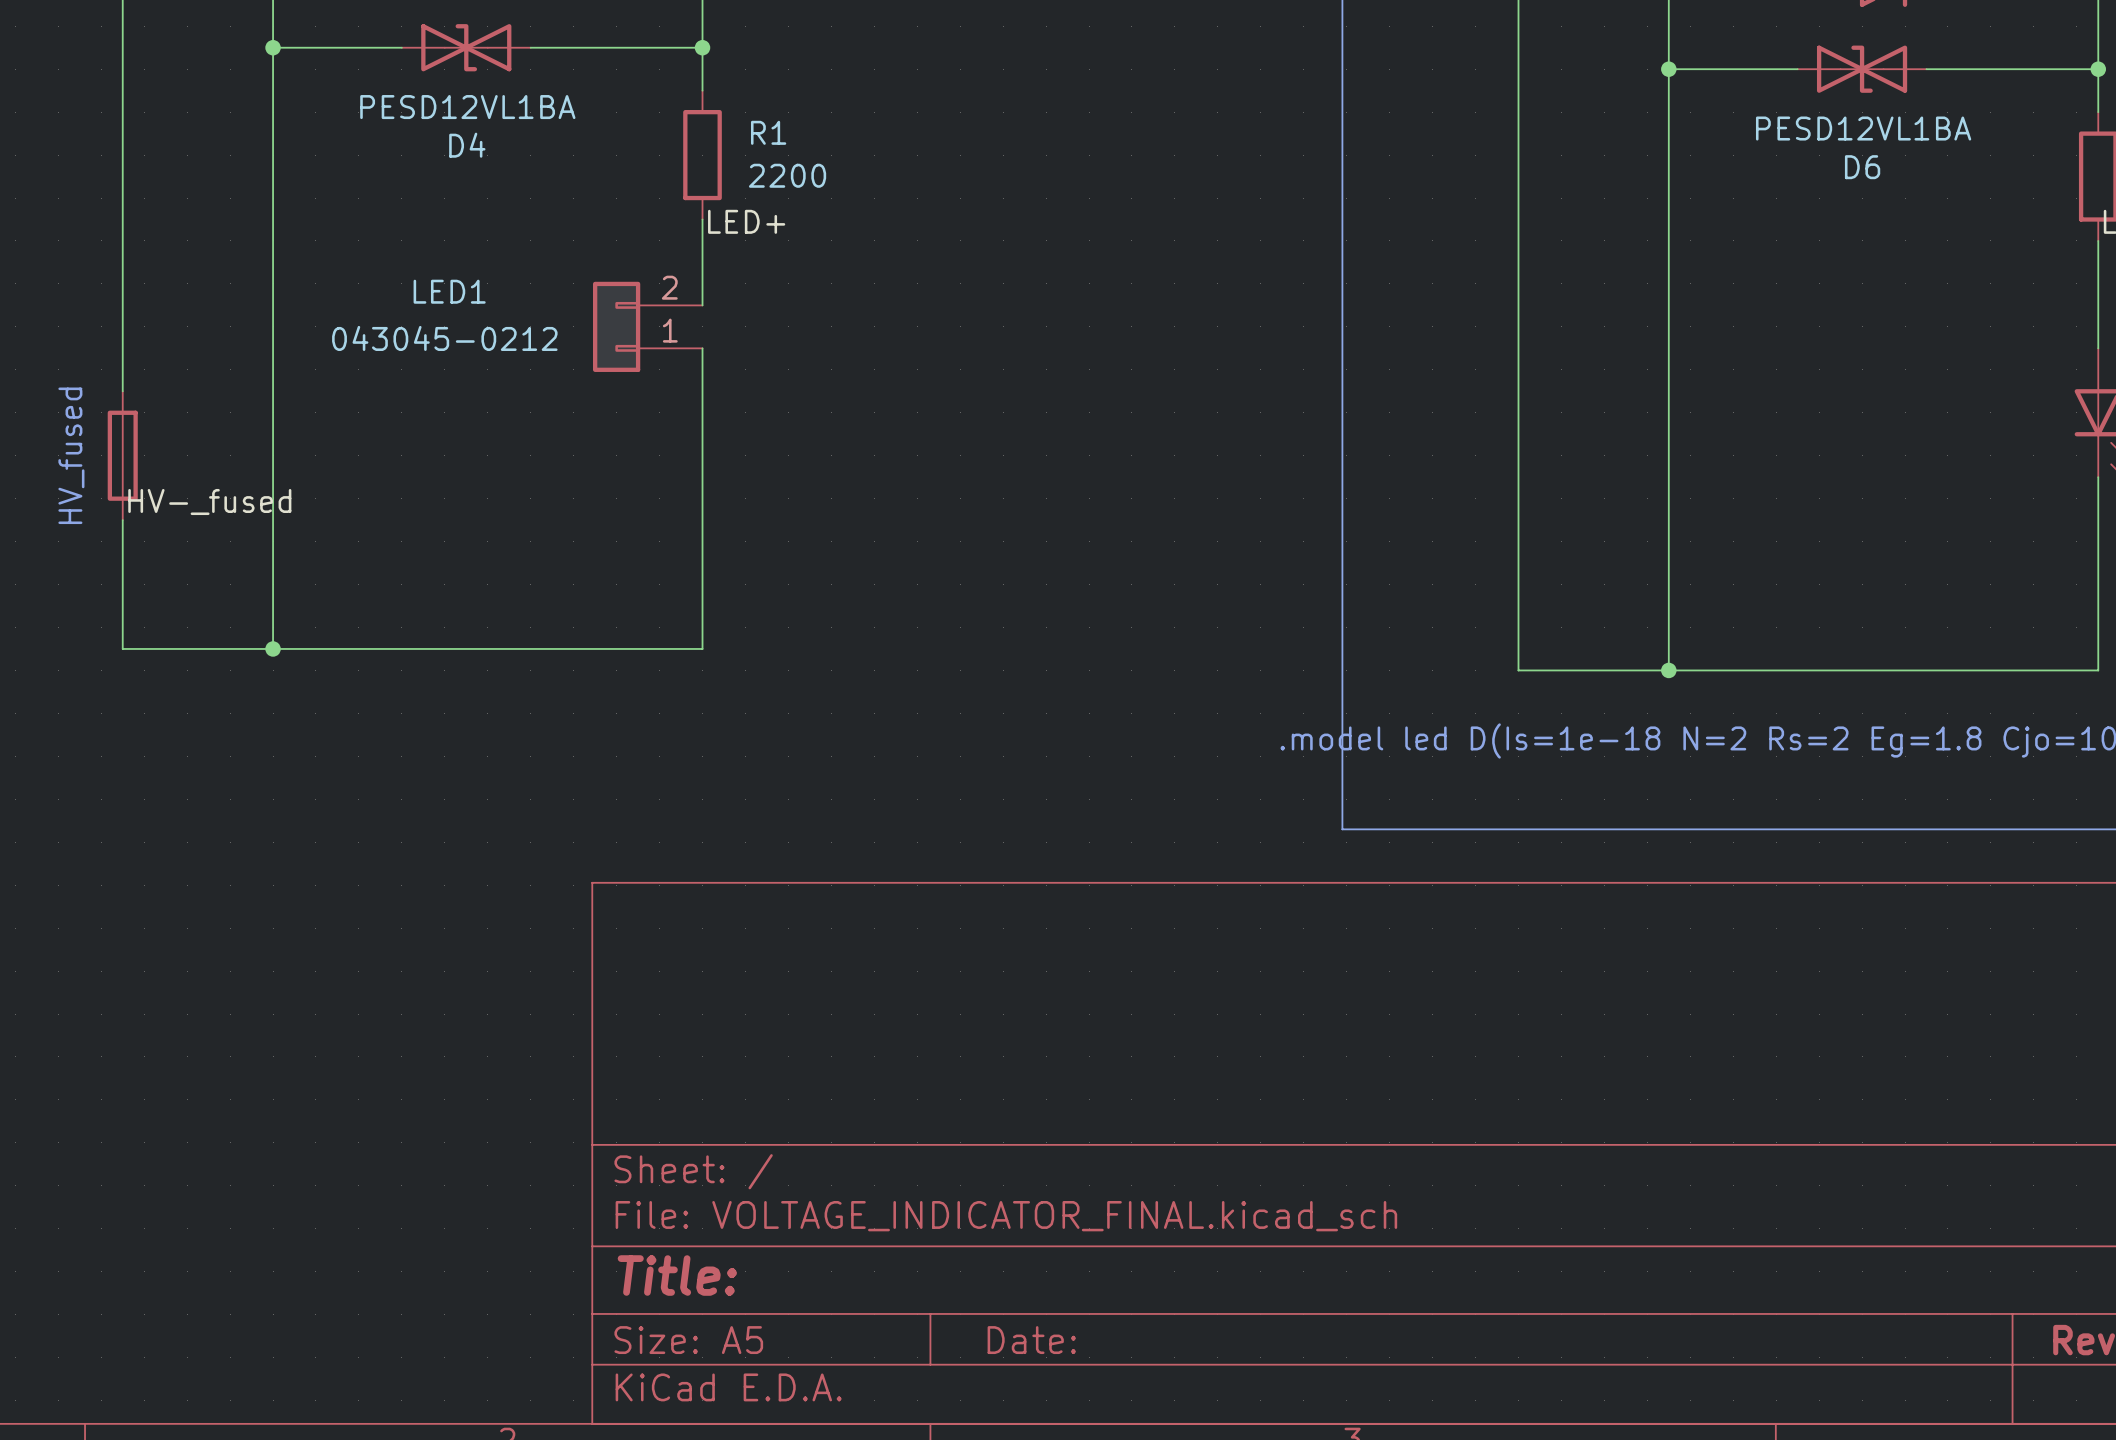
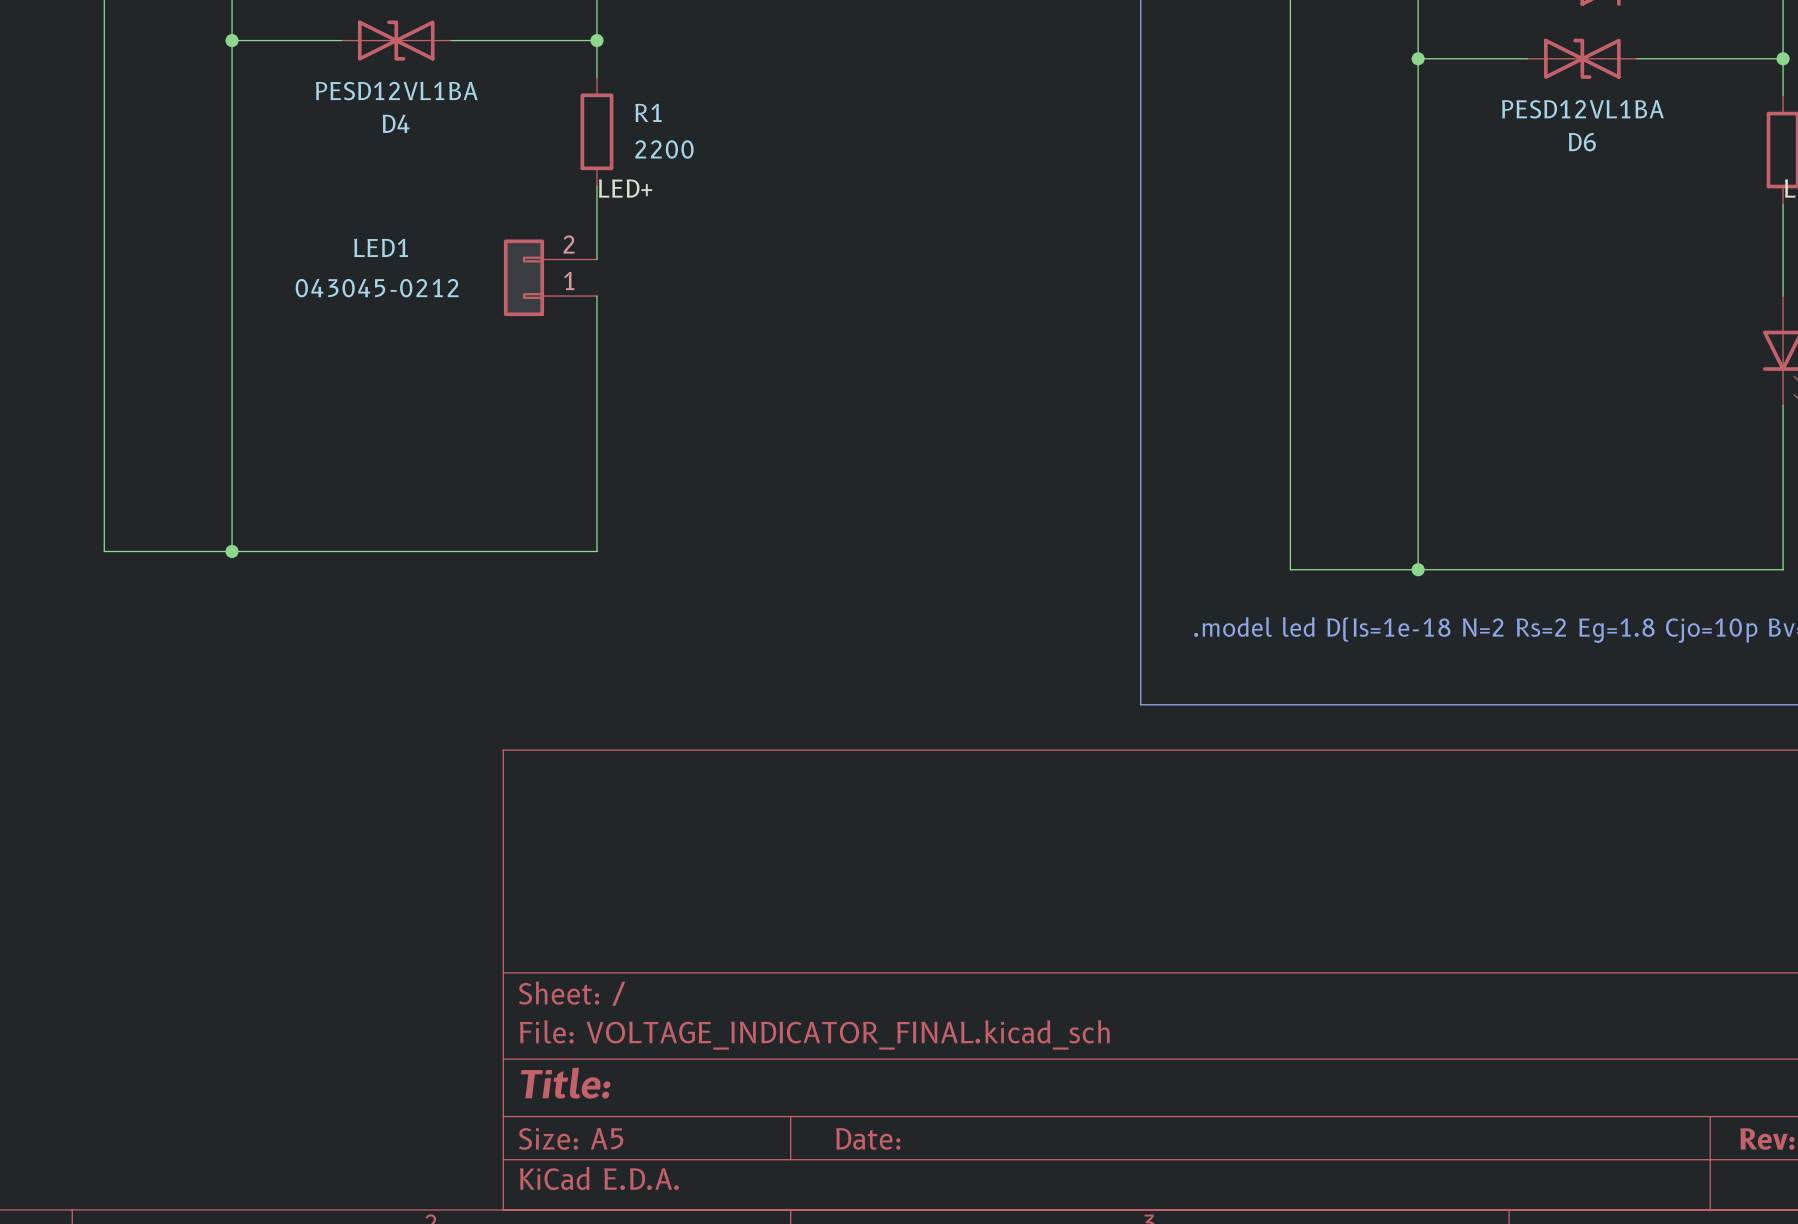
text: HV_fused (71, 455) -> none
part: (122, 455) -> none
label: HV-_fused (209, 502) -> none

